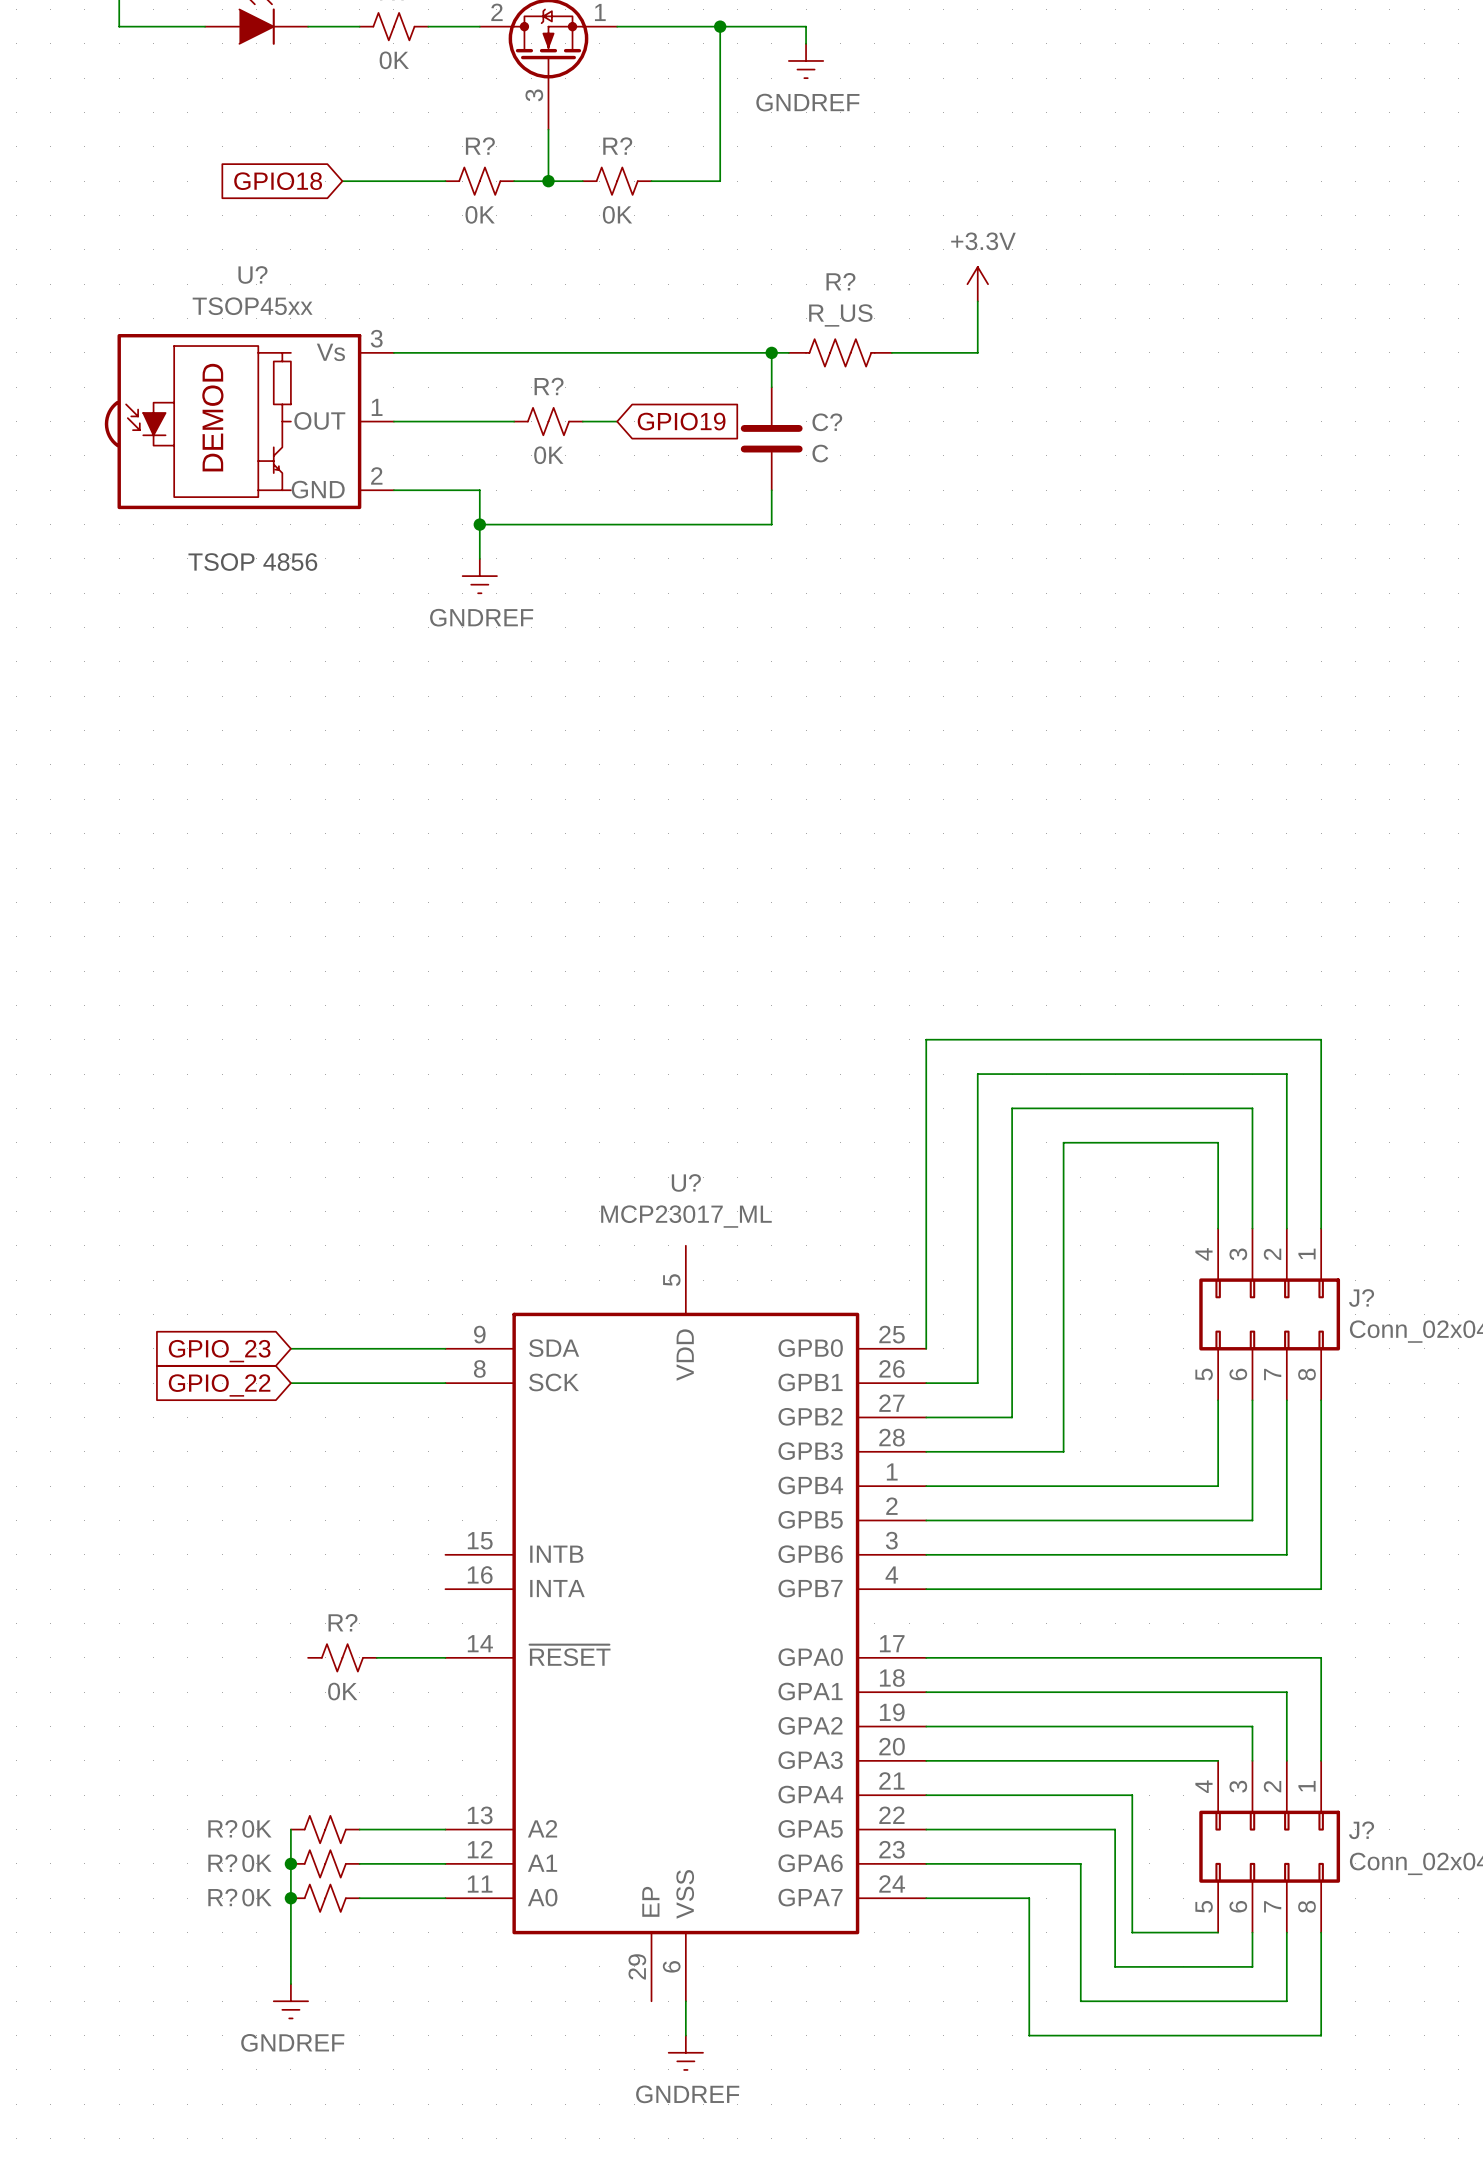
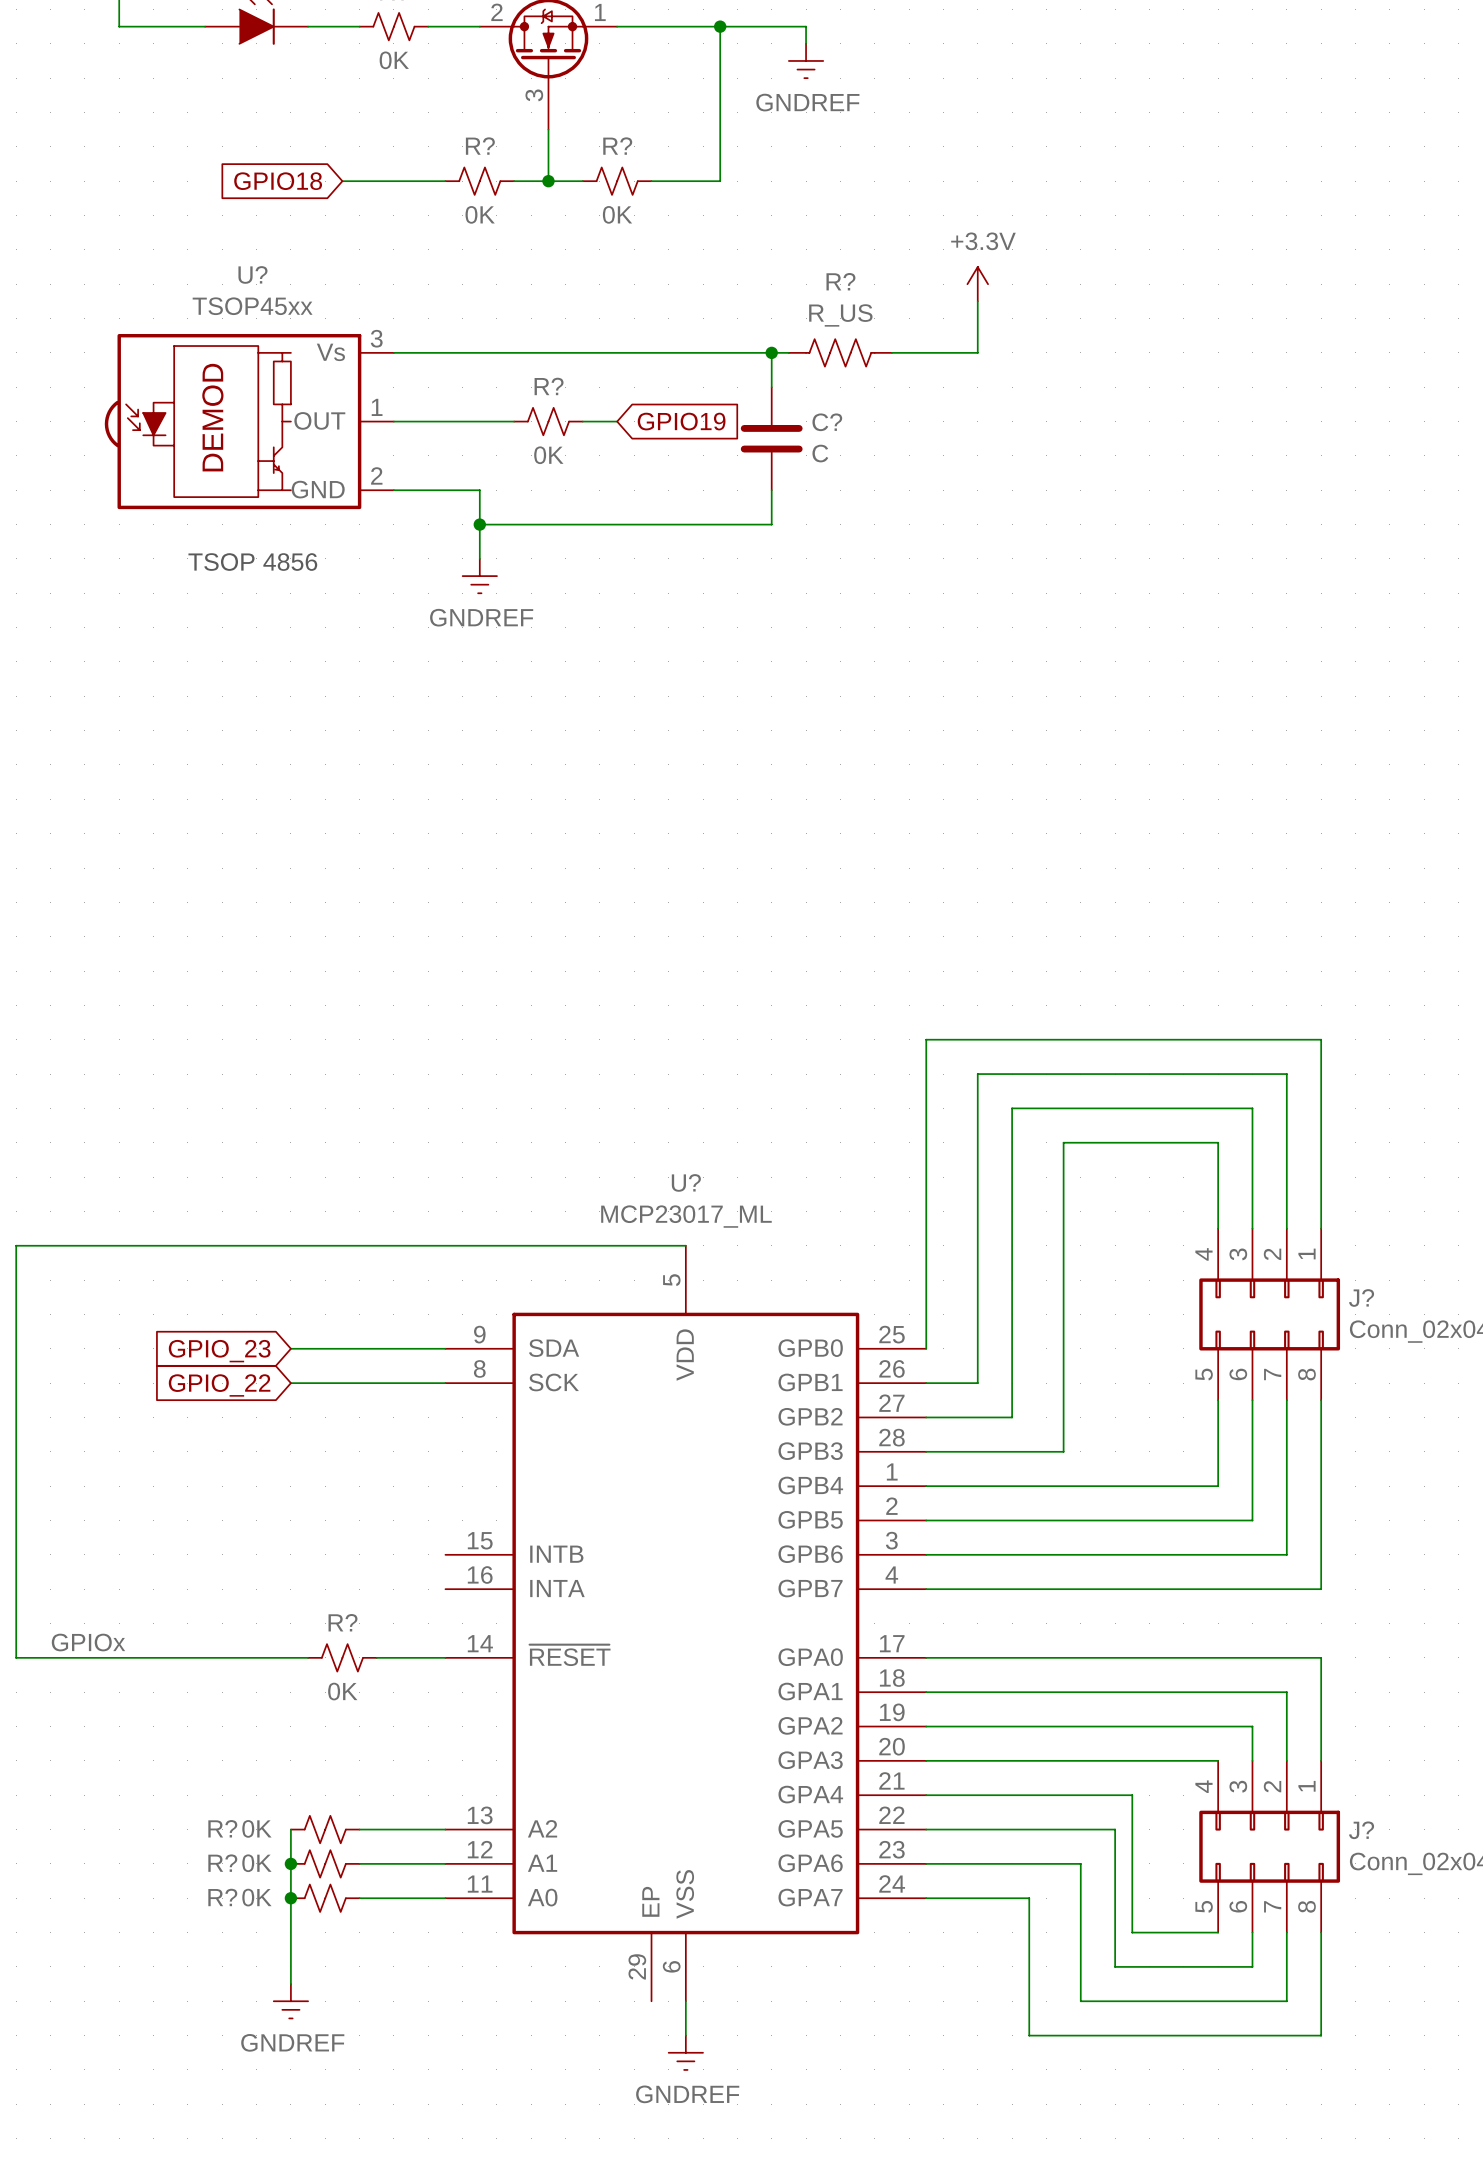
wire: none -> (685, 1245) (16, 1245) (16, 1657) (308, 1657)
label: none -> GPIOx (88, 1642)

